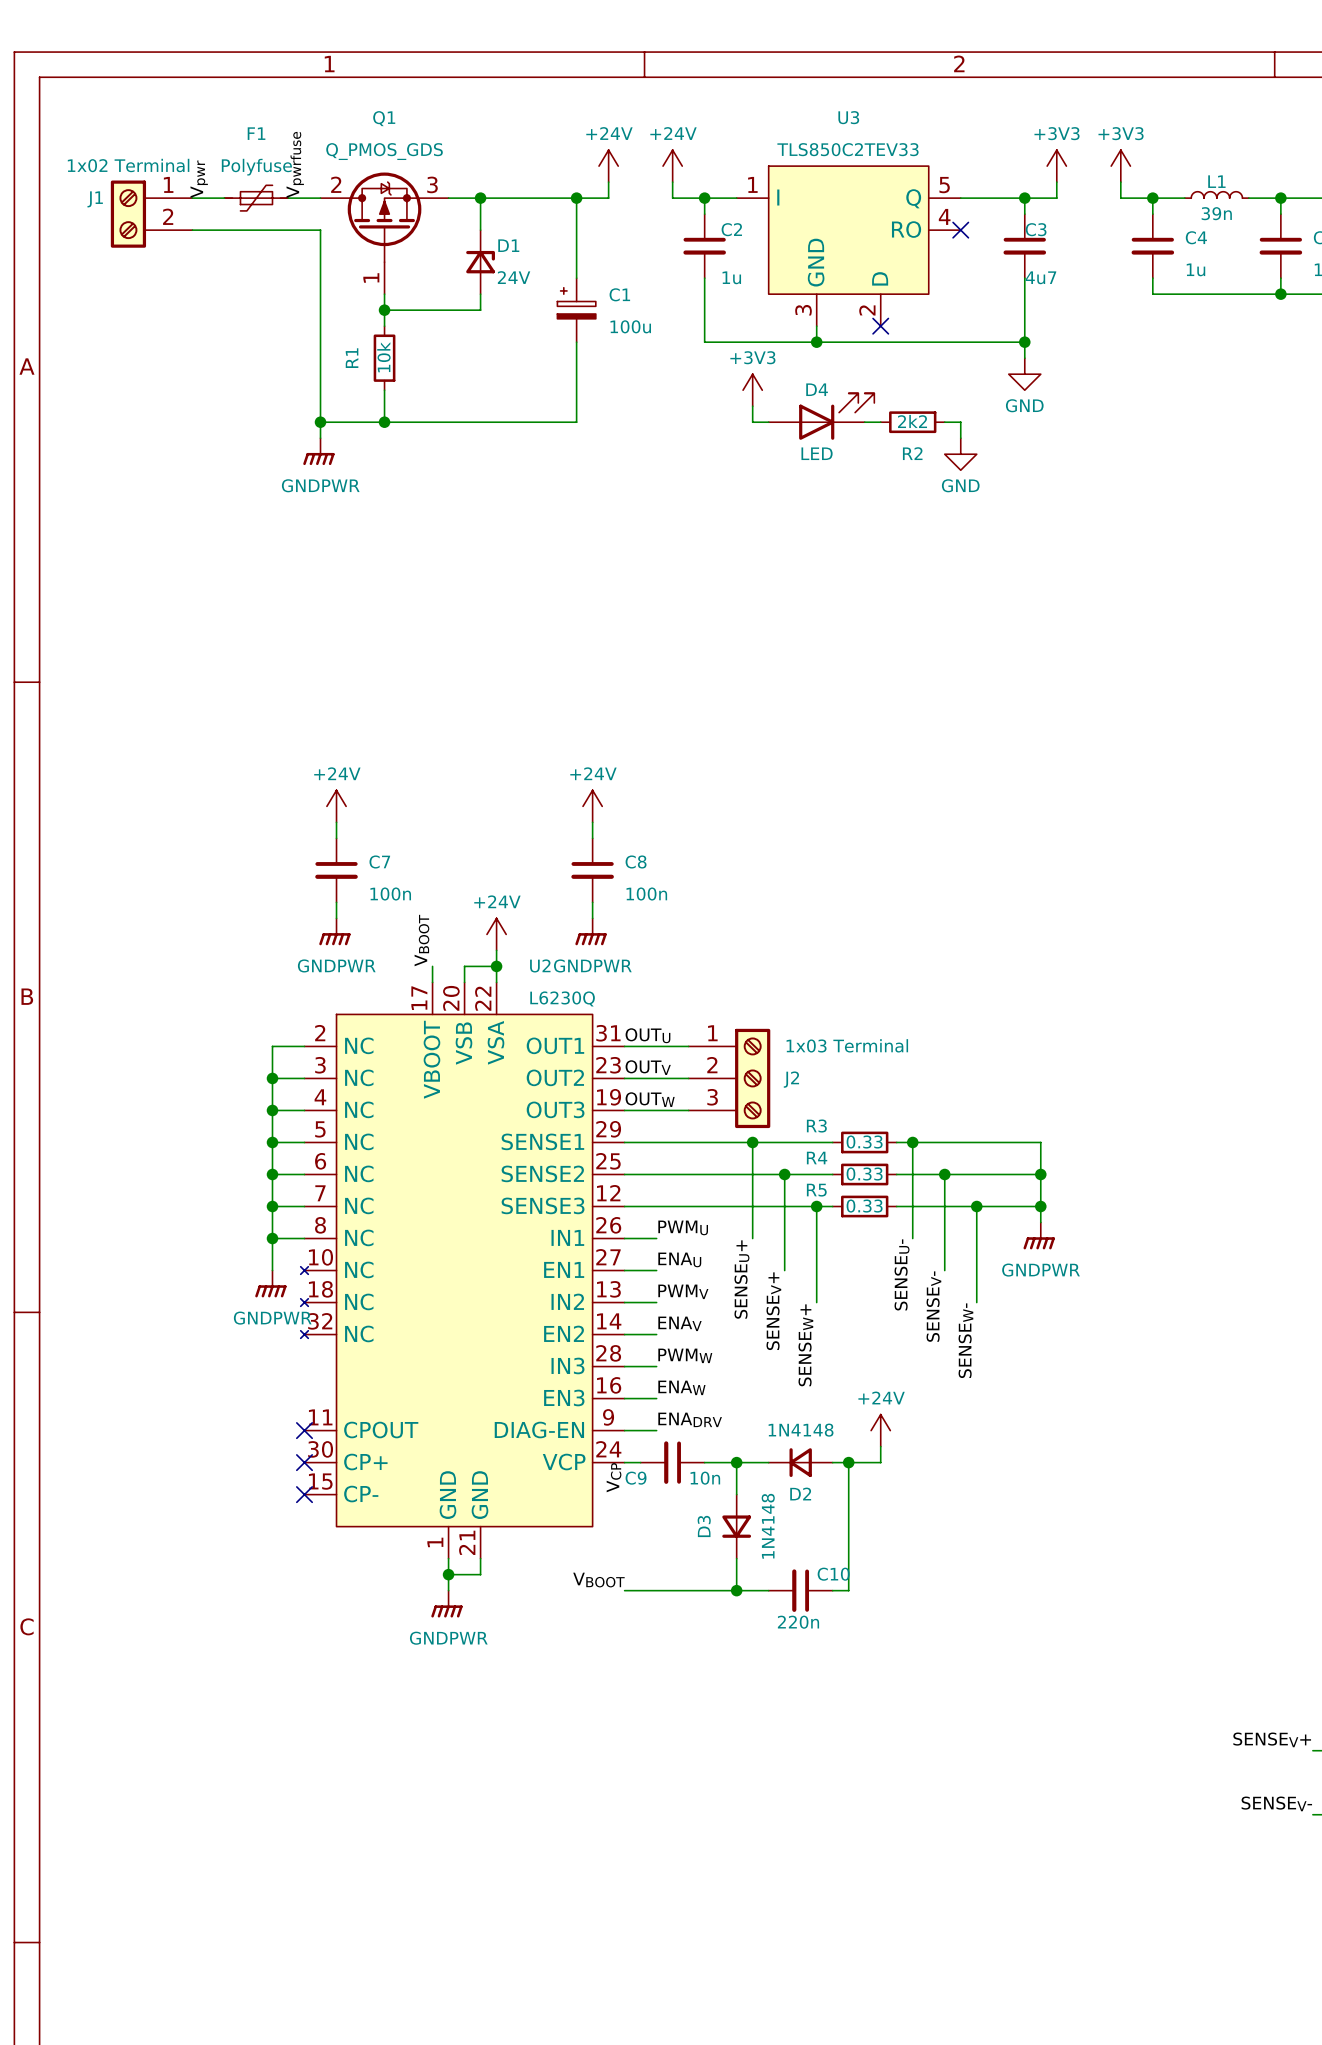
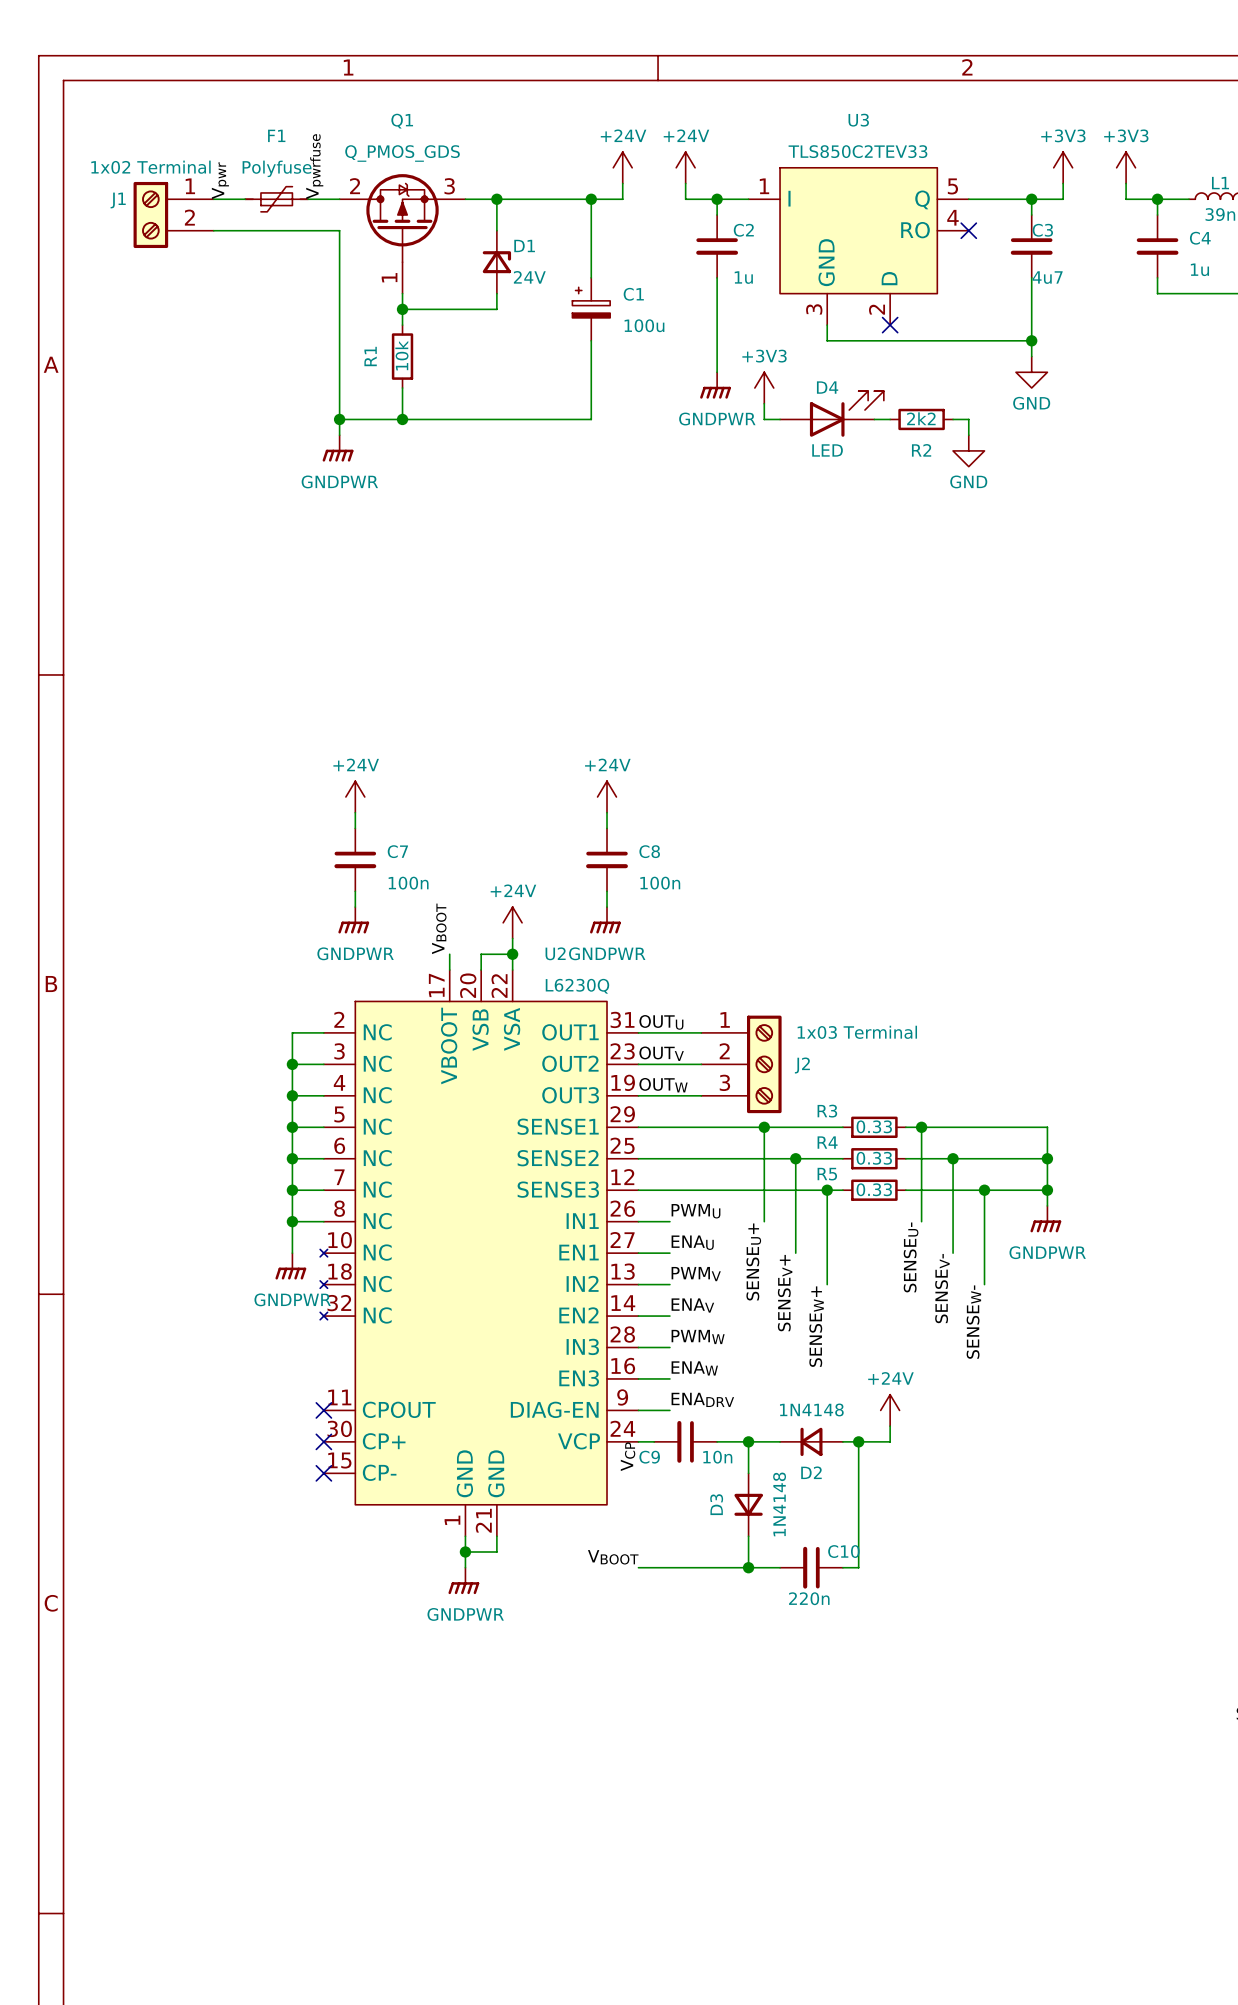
wire: (704, 342) (816, 342) -> (717, 340) (717, 372)
junction: (816, 342) -> none
power symbol: none -> GNDPWR (715, 385)

